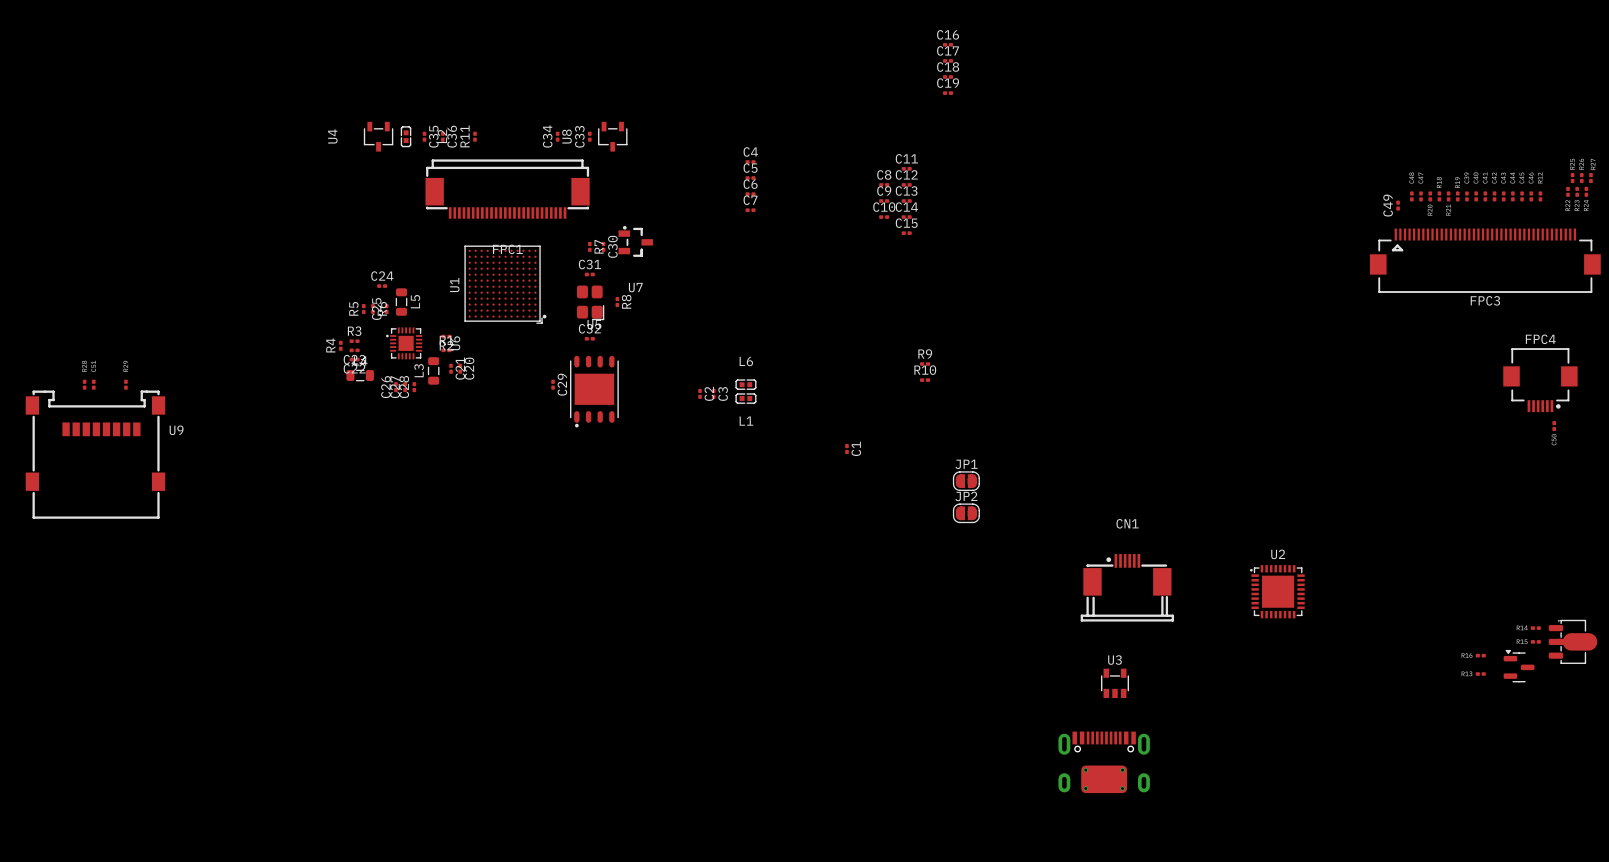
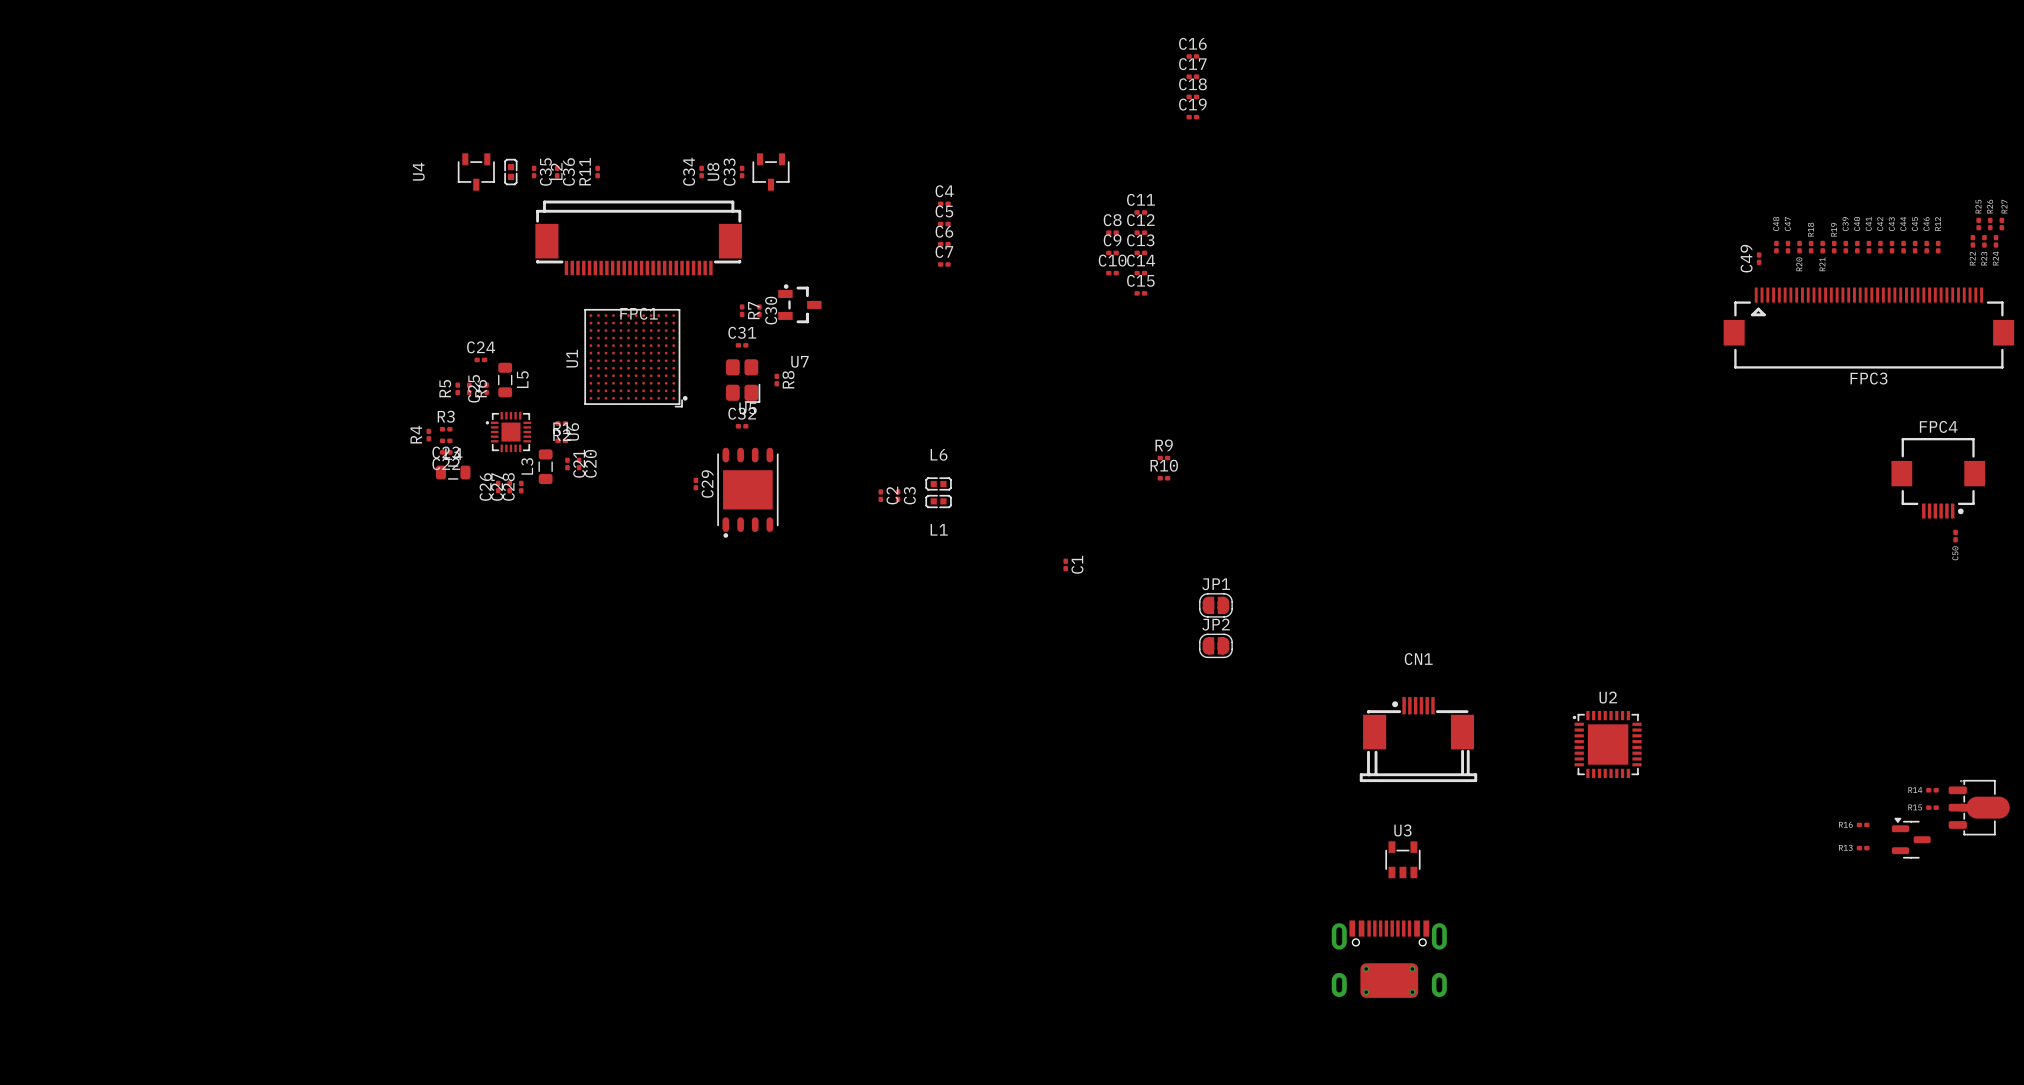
part: (84, 384) -> none
part: (93, 384) -> none
part: (125, 384) -> none
U9: (95, 454) -> none

